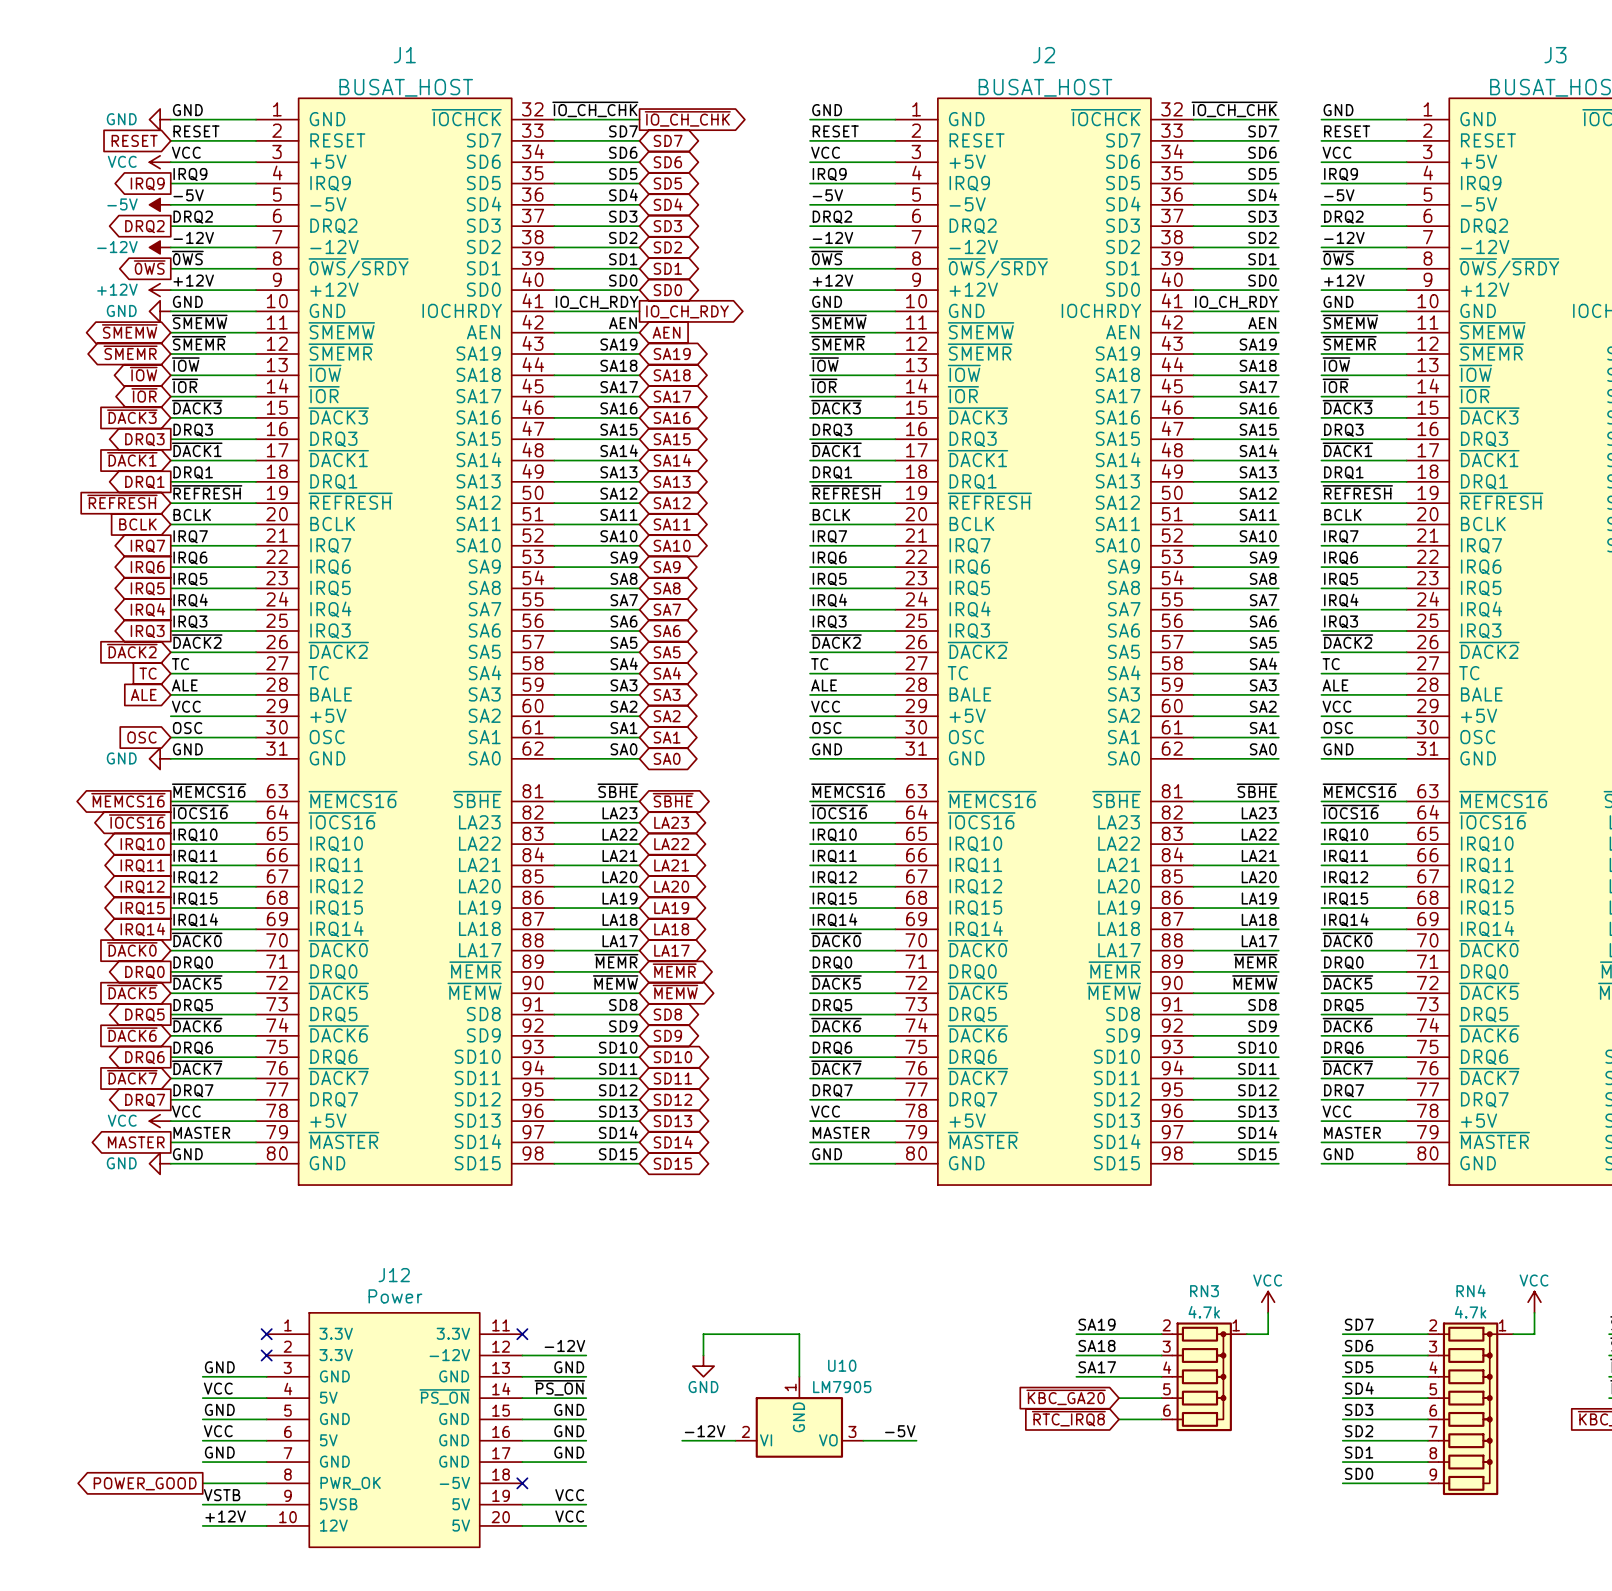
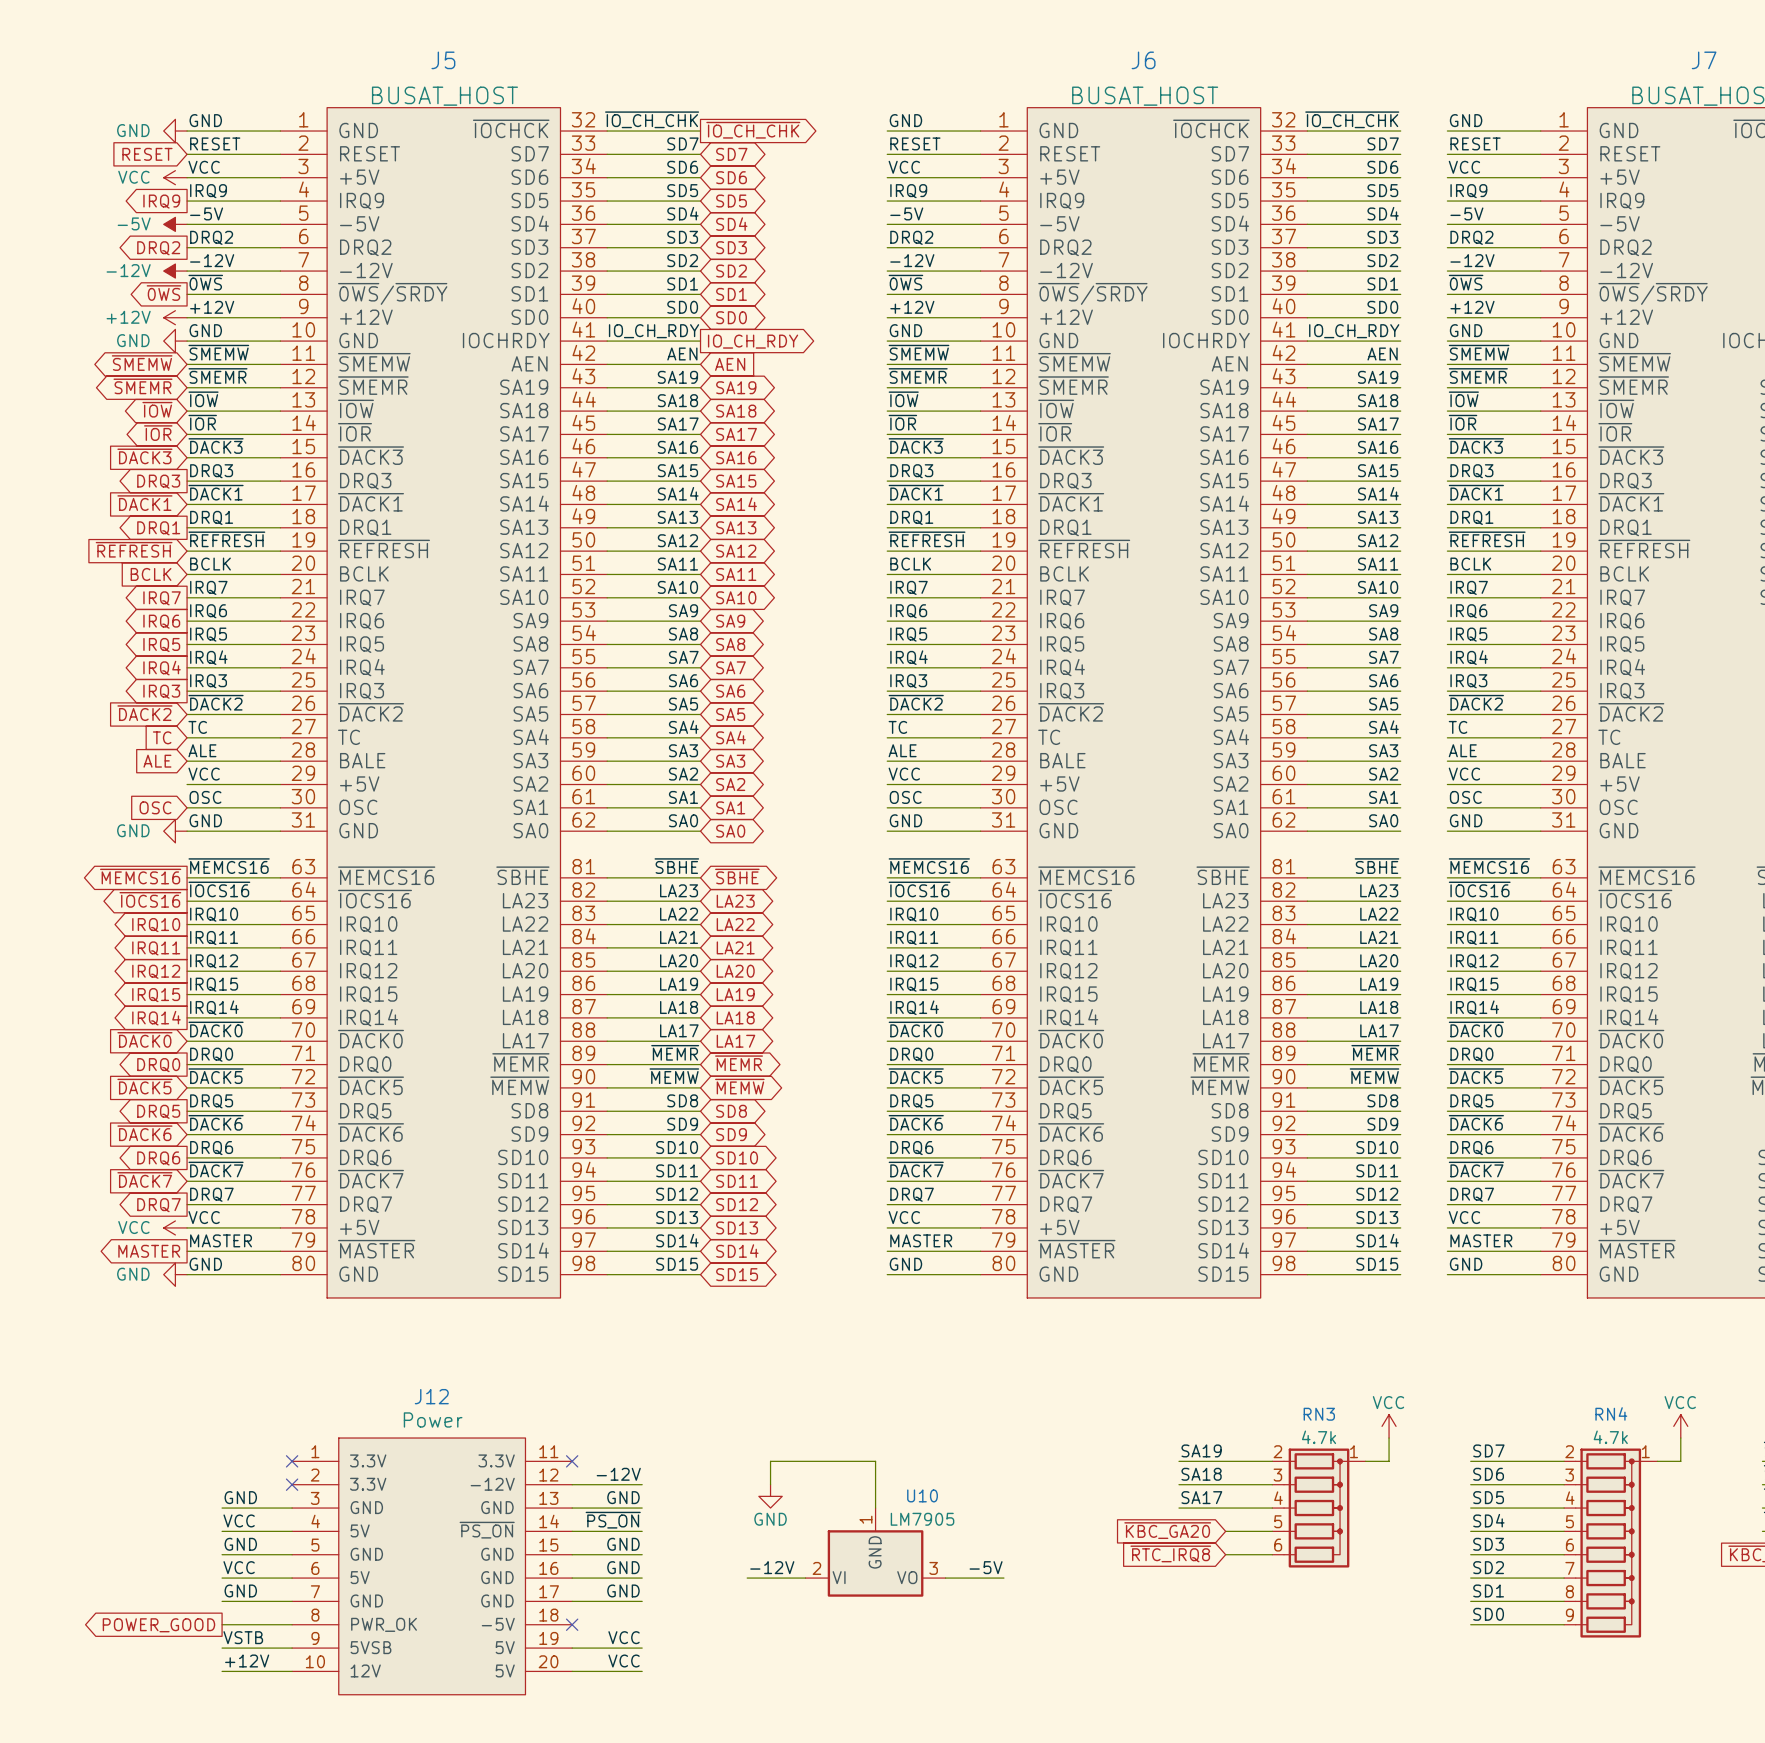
J1 name: J1 (404, 55) -> J5 (443, 60)
J2 name: J2 (1044, 55) -> J6 (1143, 60)
J3 name: J3 (1555, 55) -> J7 (1704, 60)

